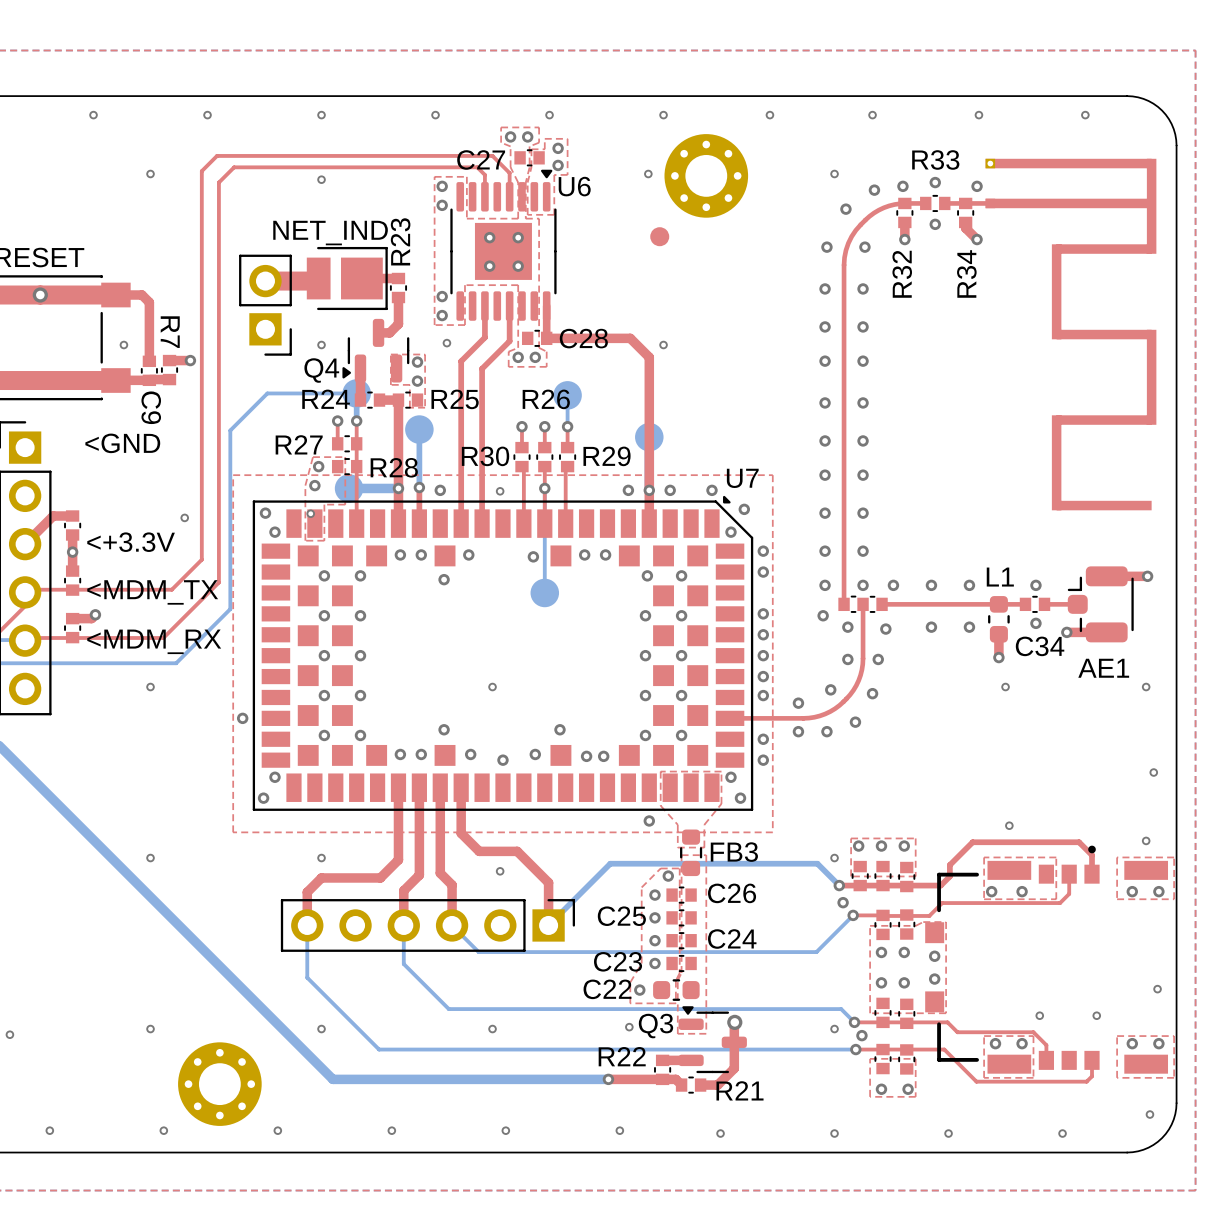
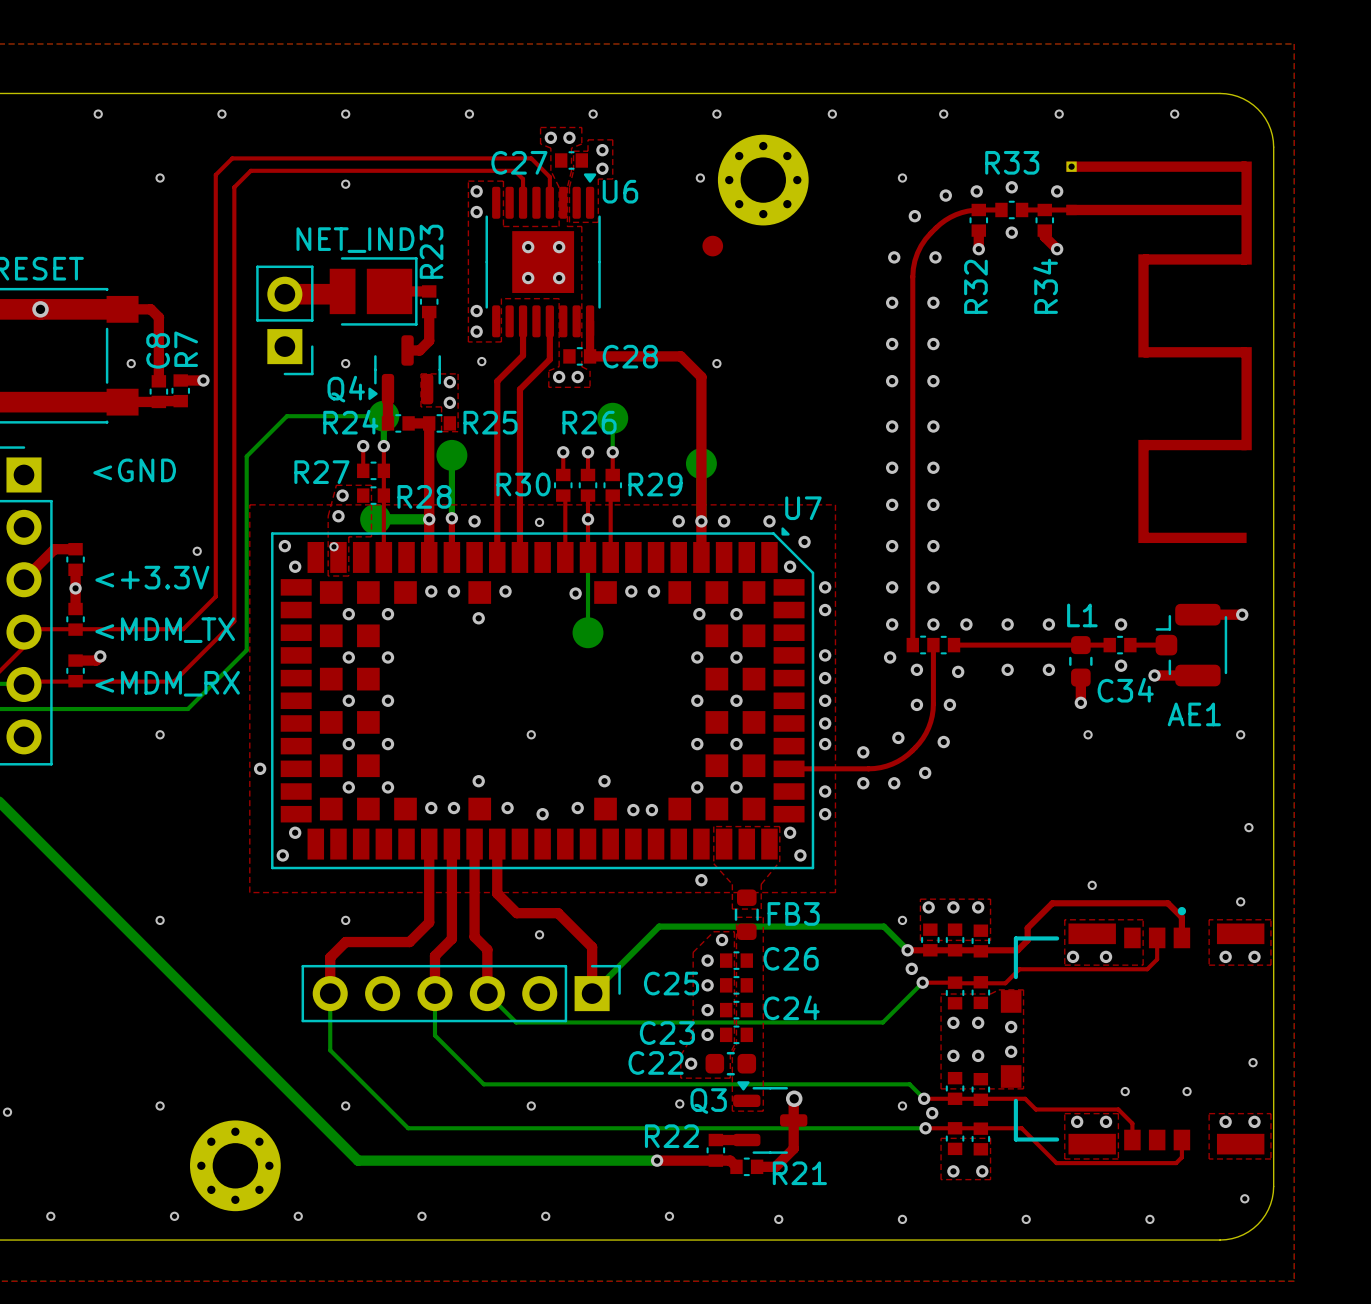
R7 name rotation: 0° (170, 332) -> 180° (186, 349)
C9 name: C9 (151, 407) -> C8 (158, 350)

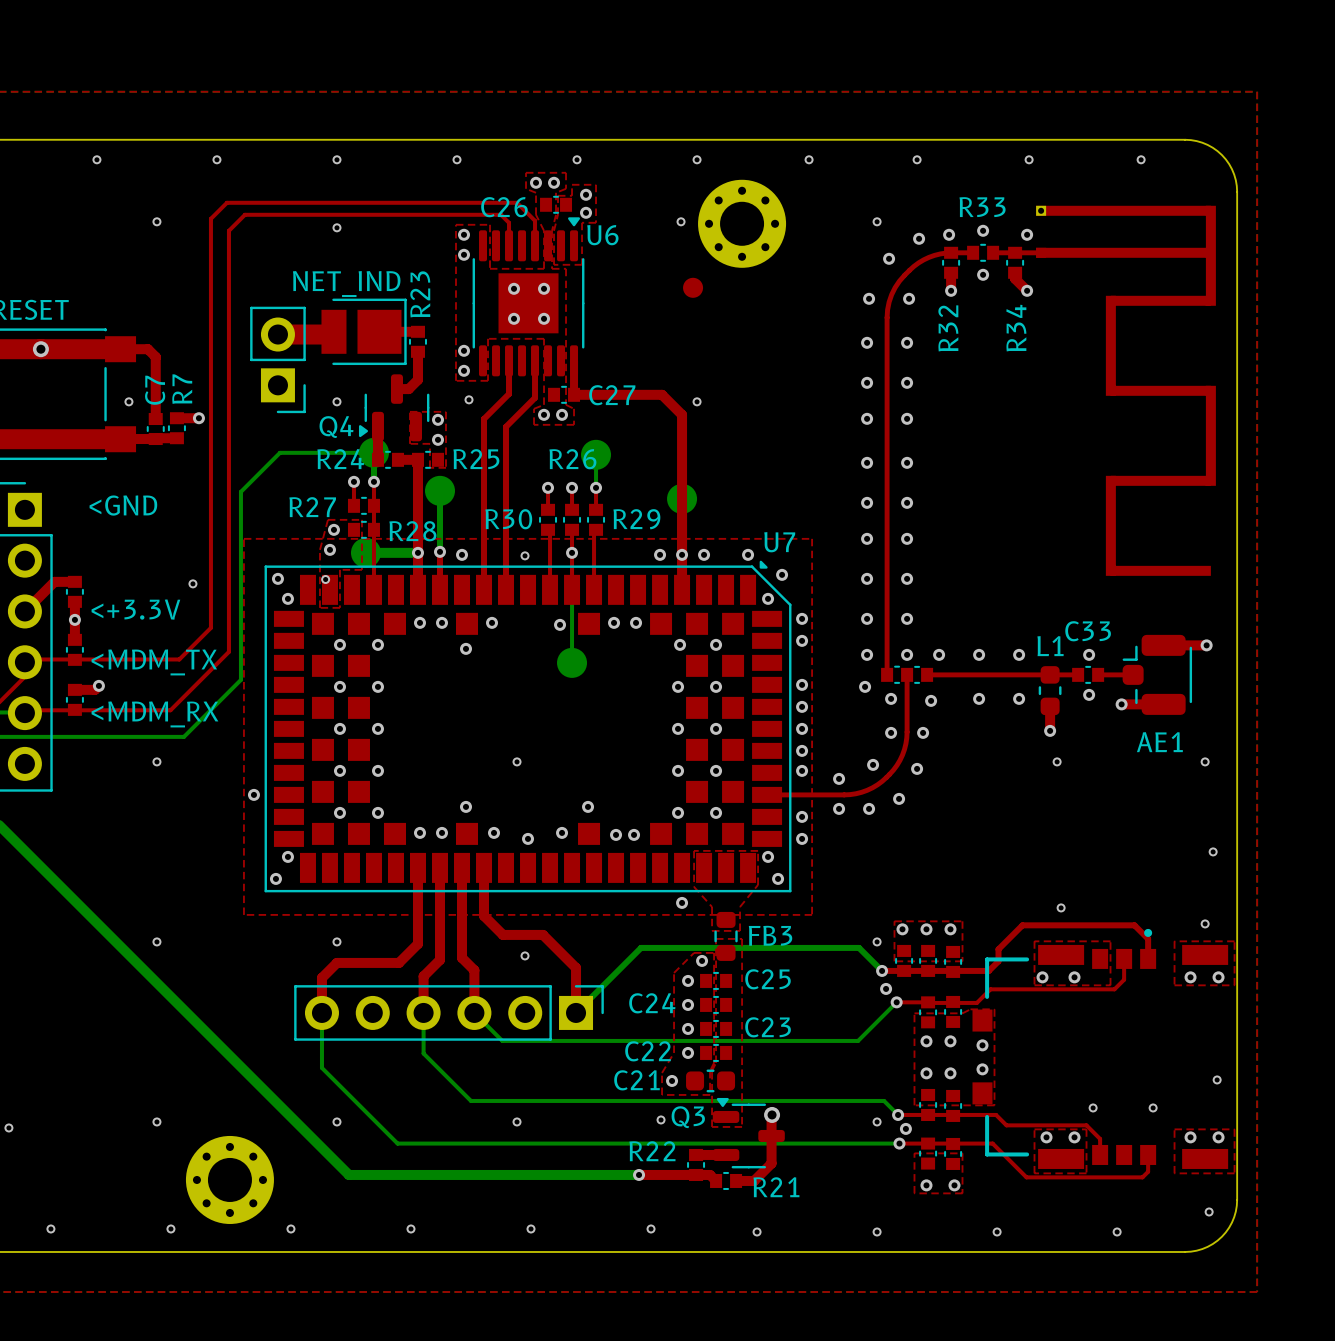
C27 name: C27 (519, 162) -> C26 (504, 207)
C8 name: C8 (158, 350) -> C7 (155, 390)
C28 name: C28 (630, 356) -> C27 (612, 395)
C34 name: C34 (1125, 690) -> C33 (1088, 631)
C26 name: C26 (791, 958) -> C25 (767, 979)
C25 name: C25 (671, 983) -> C24 (652, 1003)
C24 name: C24 (791, 1007) -> C23 (768, 1027)
C23 name: C23 (667, 1033) -> C22 (648, 1051)
C22 name: C22 (656, 1062) -> C21 (636, 1080)

